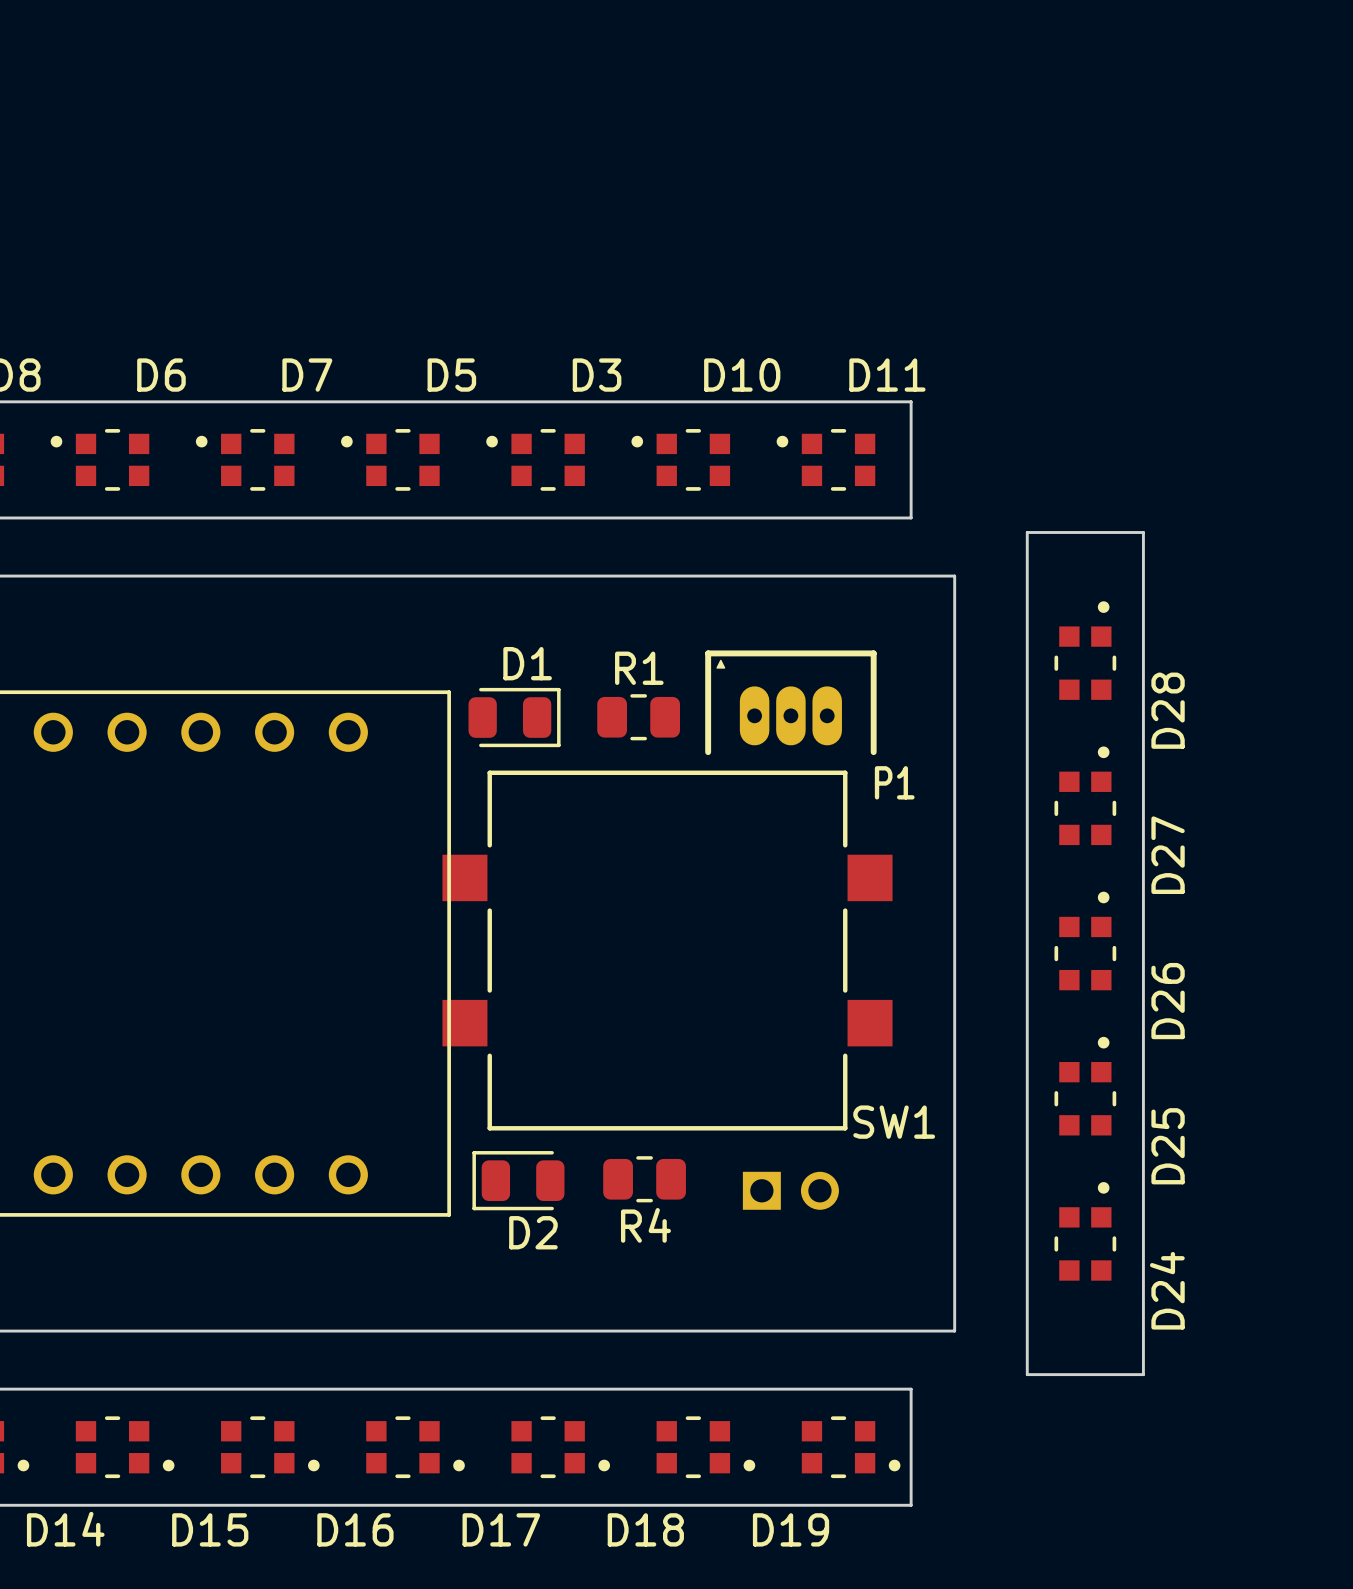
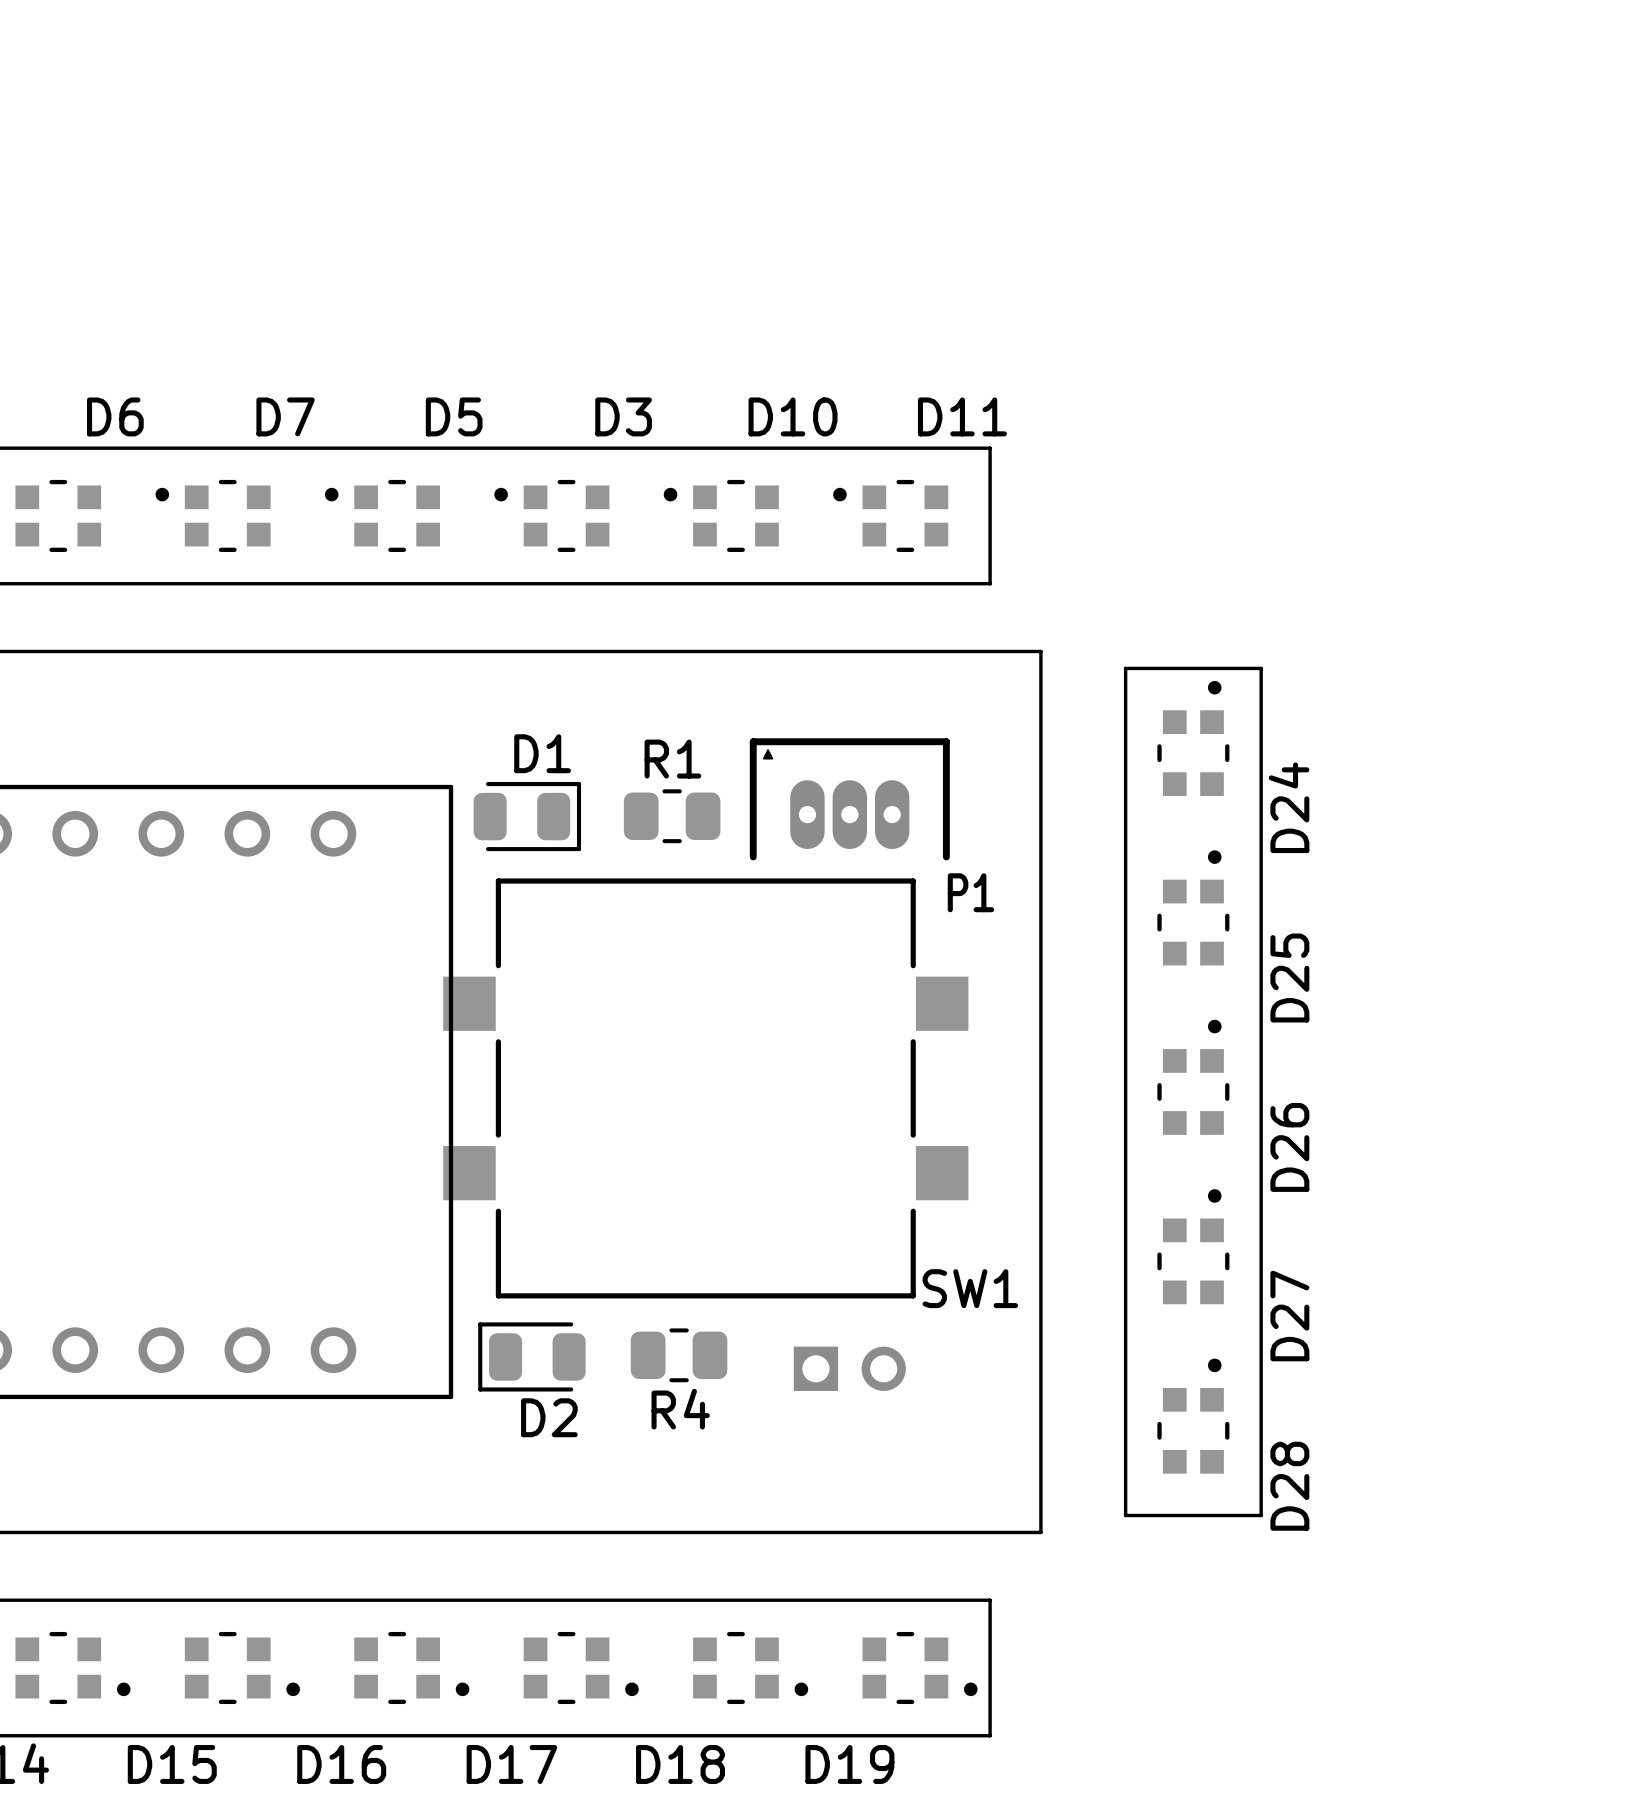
board edge: (1027, 590) (1027, 532) (1143, 532) (1143, 590) -> (1125, 668) (1261, 668)
D28 name: D28 (1168, 710) -> D24 (1289, 807)
D27 name: D27 (1168, 855) -> D25 (1289, 977)
D25 name: D25 (1168, 1146) -> D27 (1289, 1316)
D24 name: D24 (1167, 1290) -> D28 (1289, 1486)
board edge: (1027, 1316) (1027, 1374) (1143, 1374) (1143, 1316) -> (1125, 1515) (1261, 1515)

